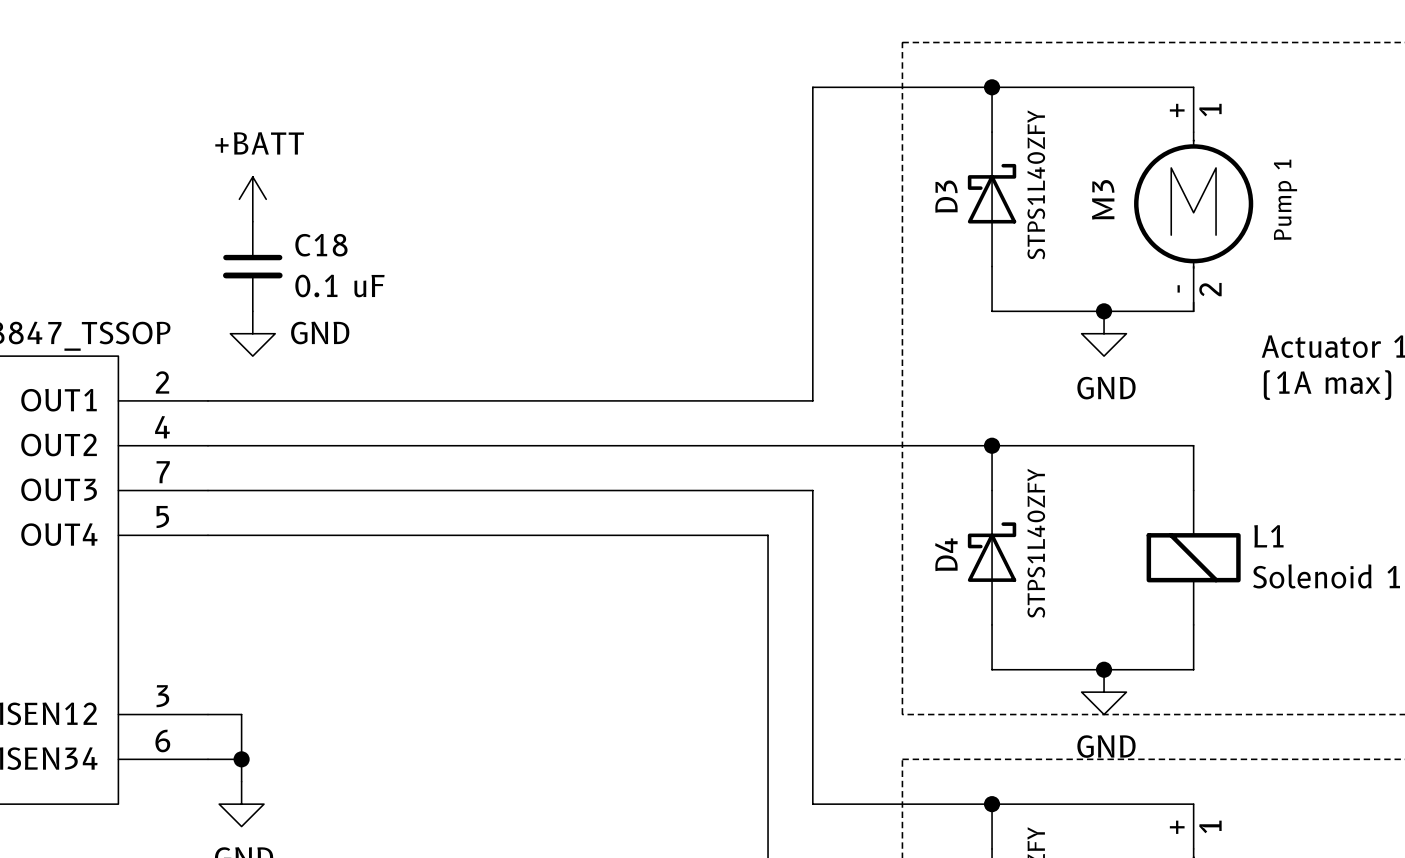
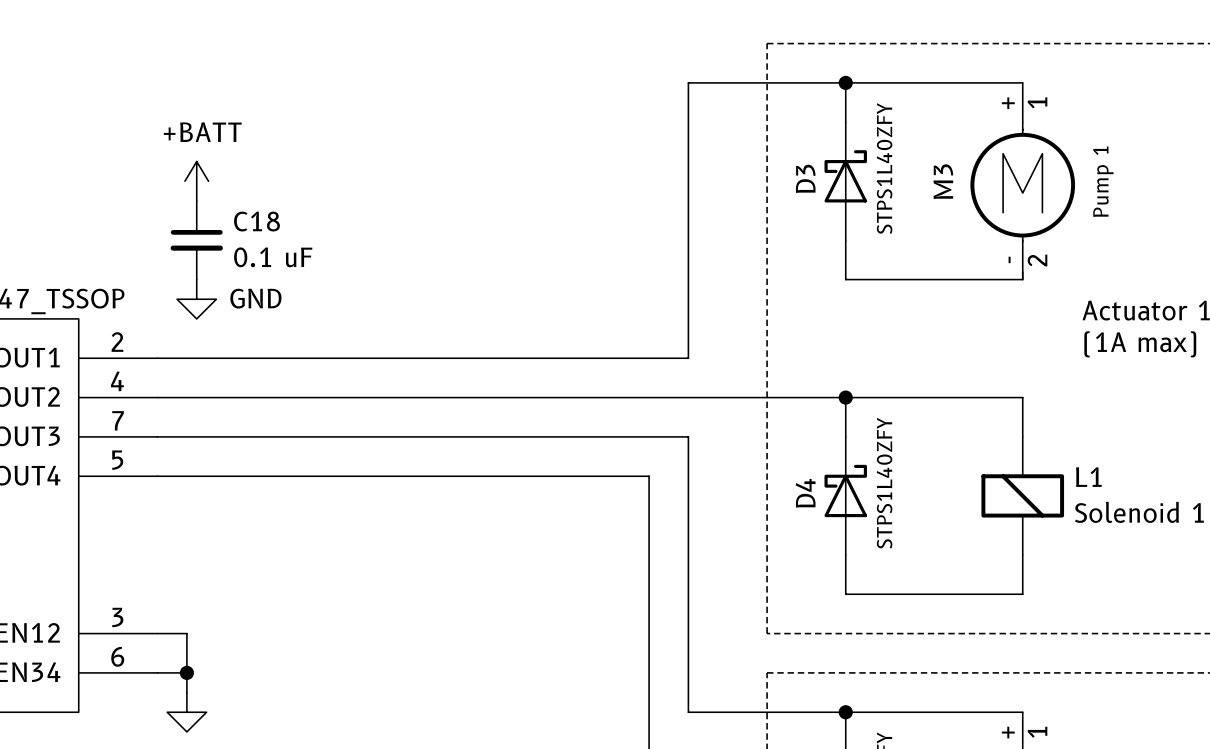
junction: (1104, 311) -> none
power symbol: GND (1104, 333) -> none
junction: (1104, 669) -> none
power symbol: GND (1104, 692) -> none

